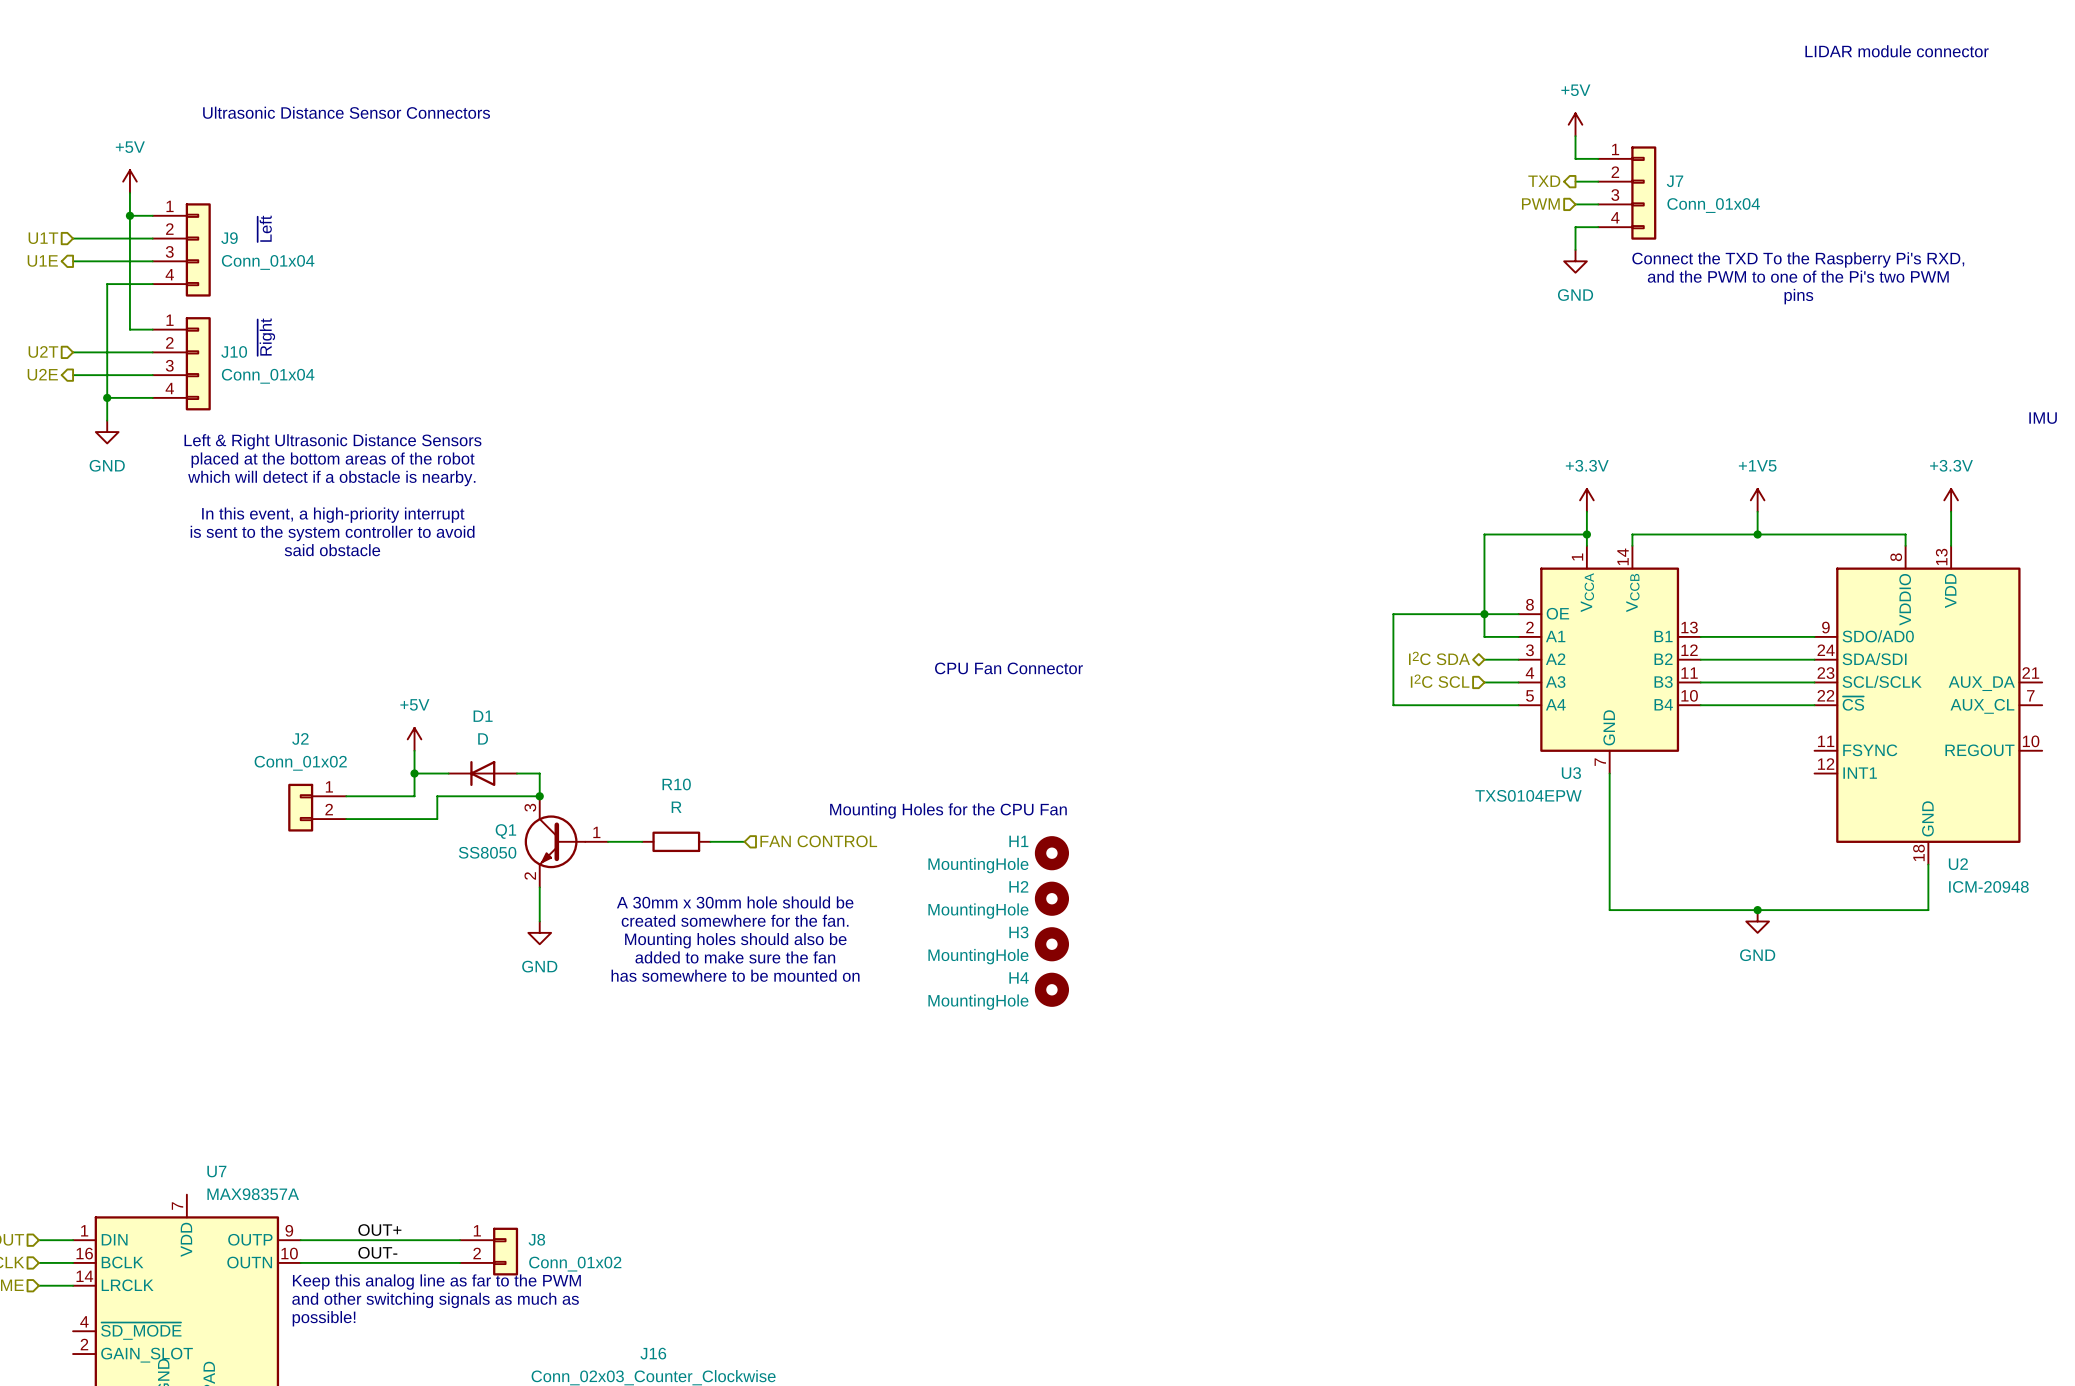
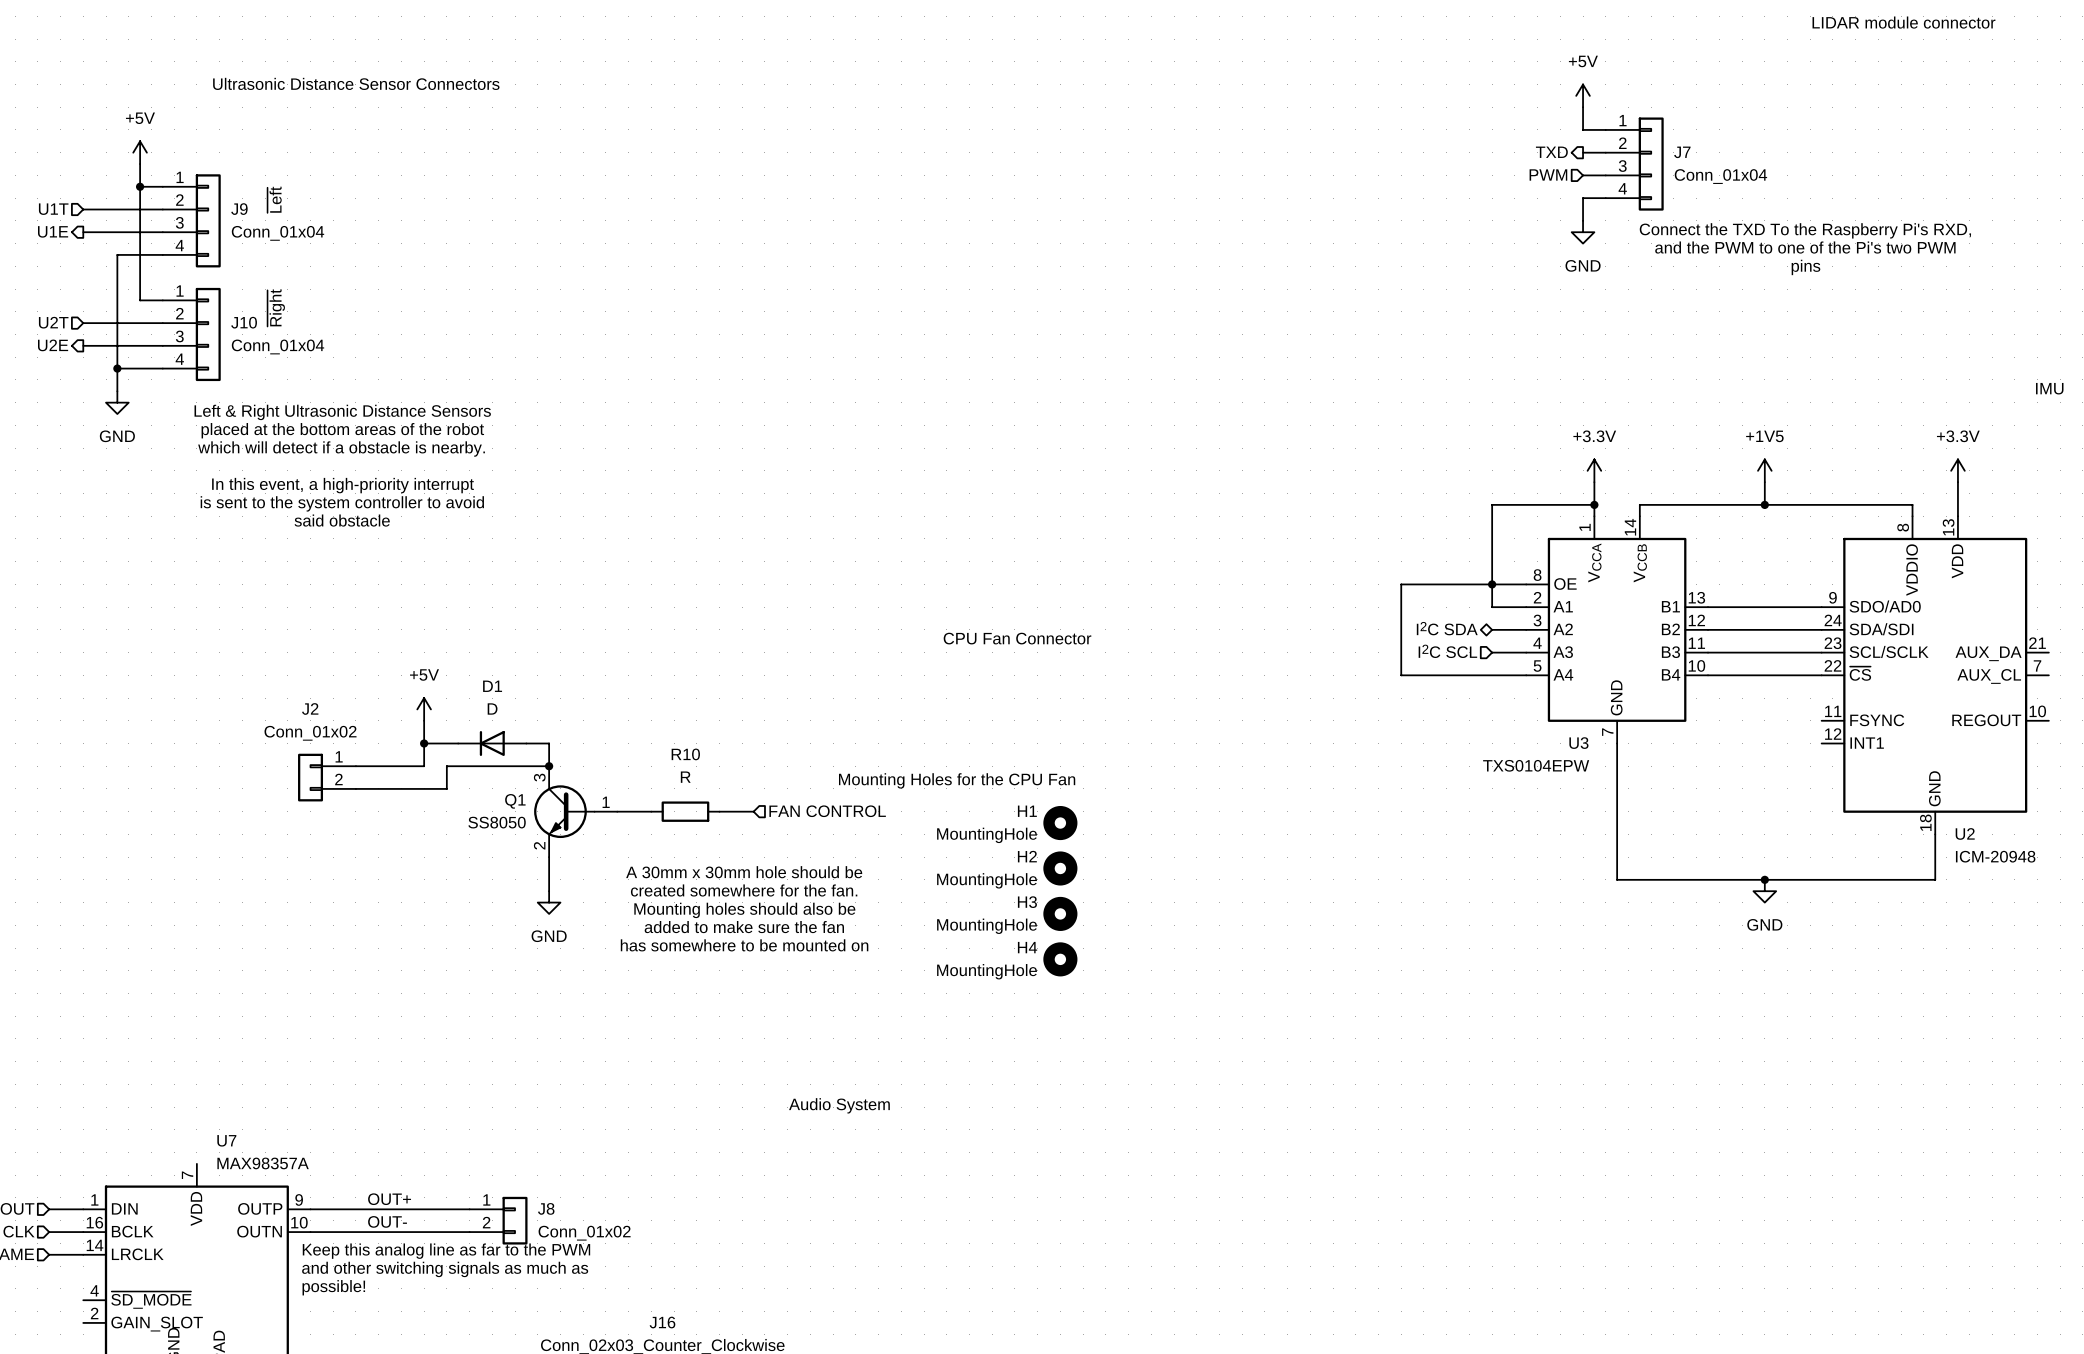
text: none -> Audio System (839, 1105)

